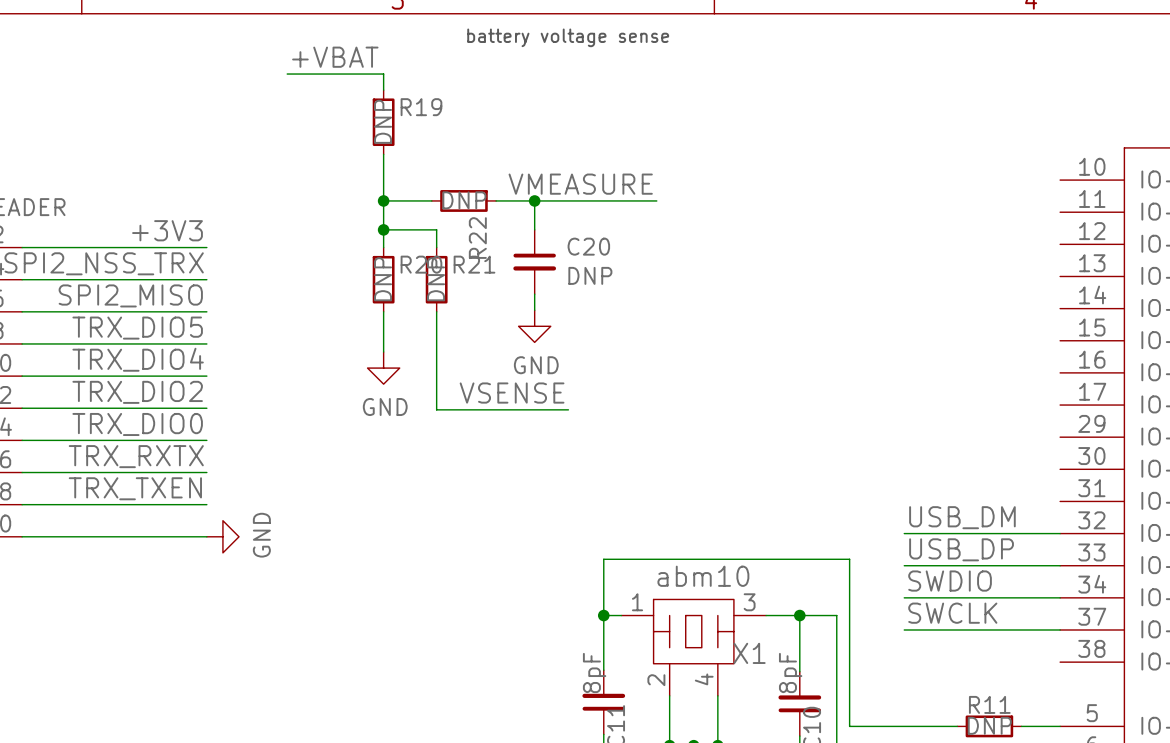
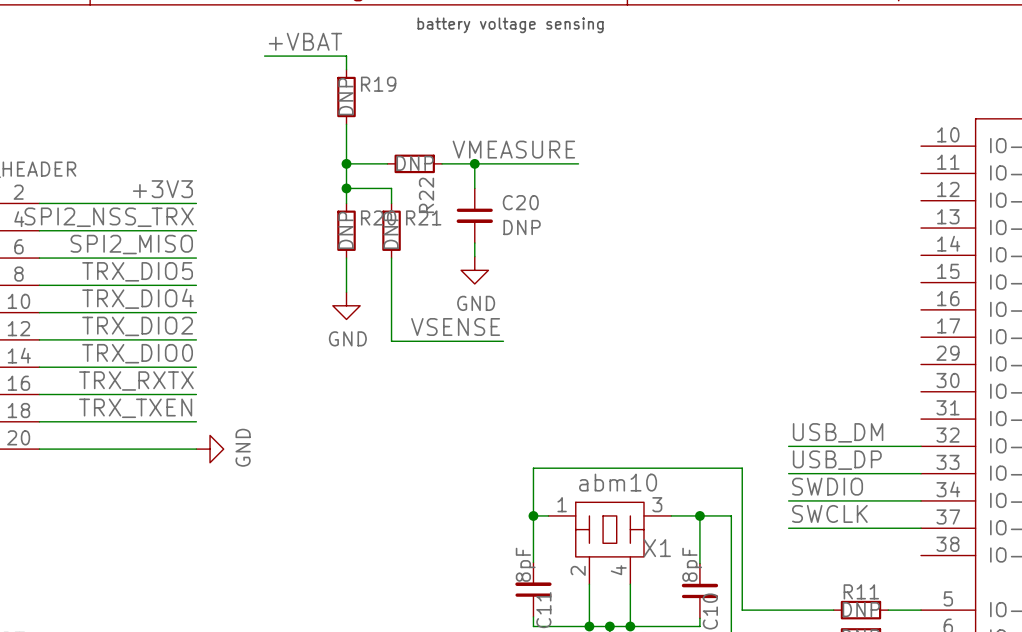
text: battery voltage sense (568, 37) -> battery voltage sensing (510, 25)

